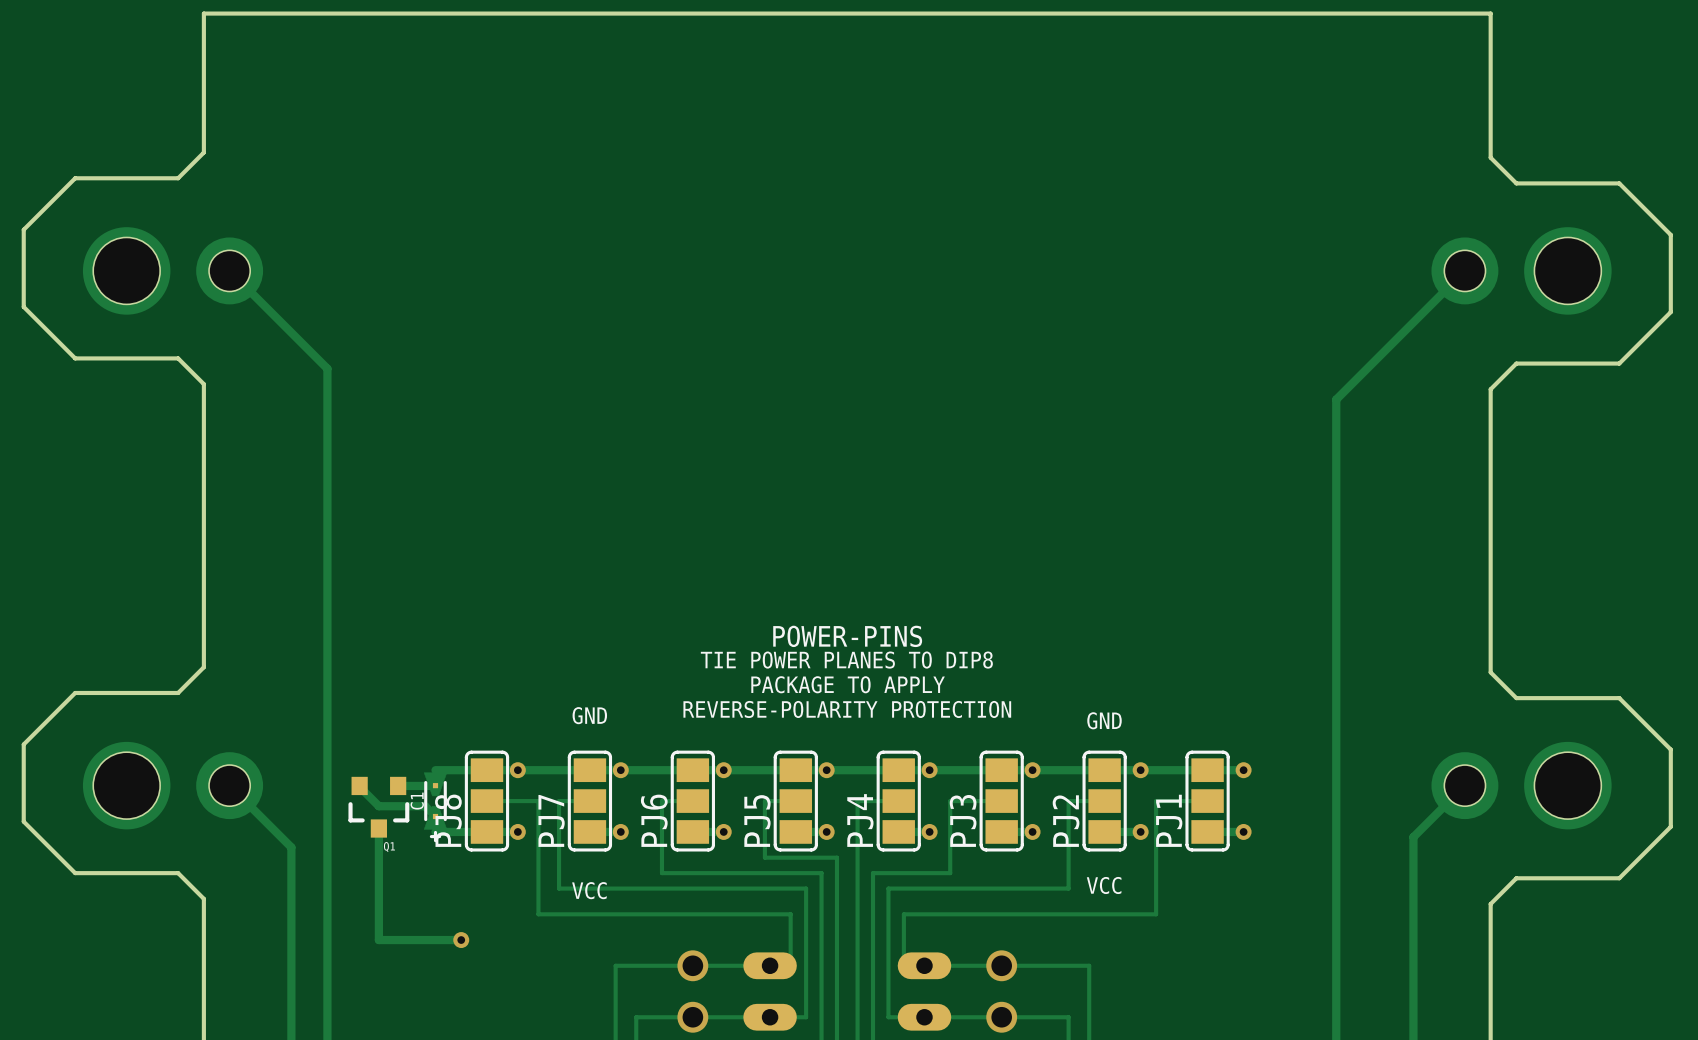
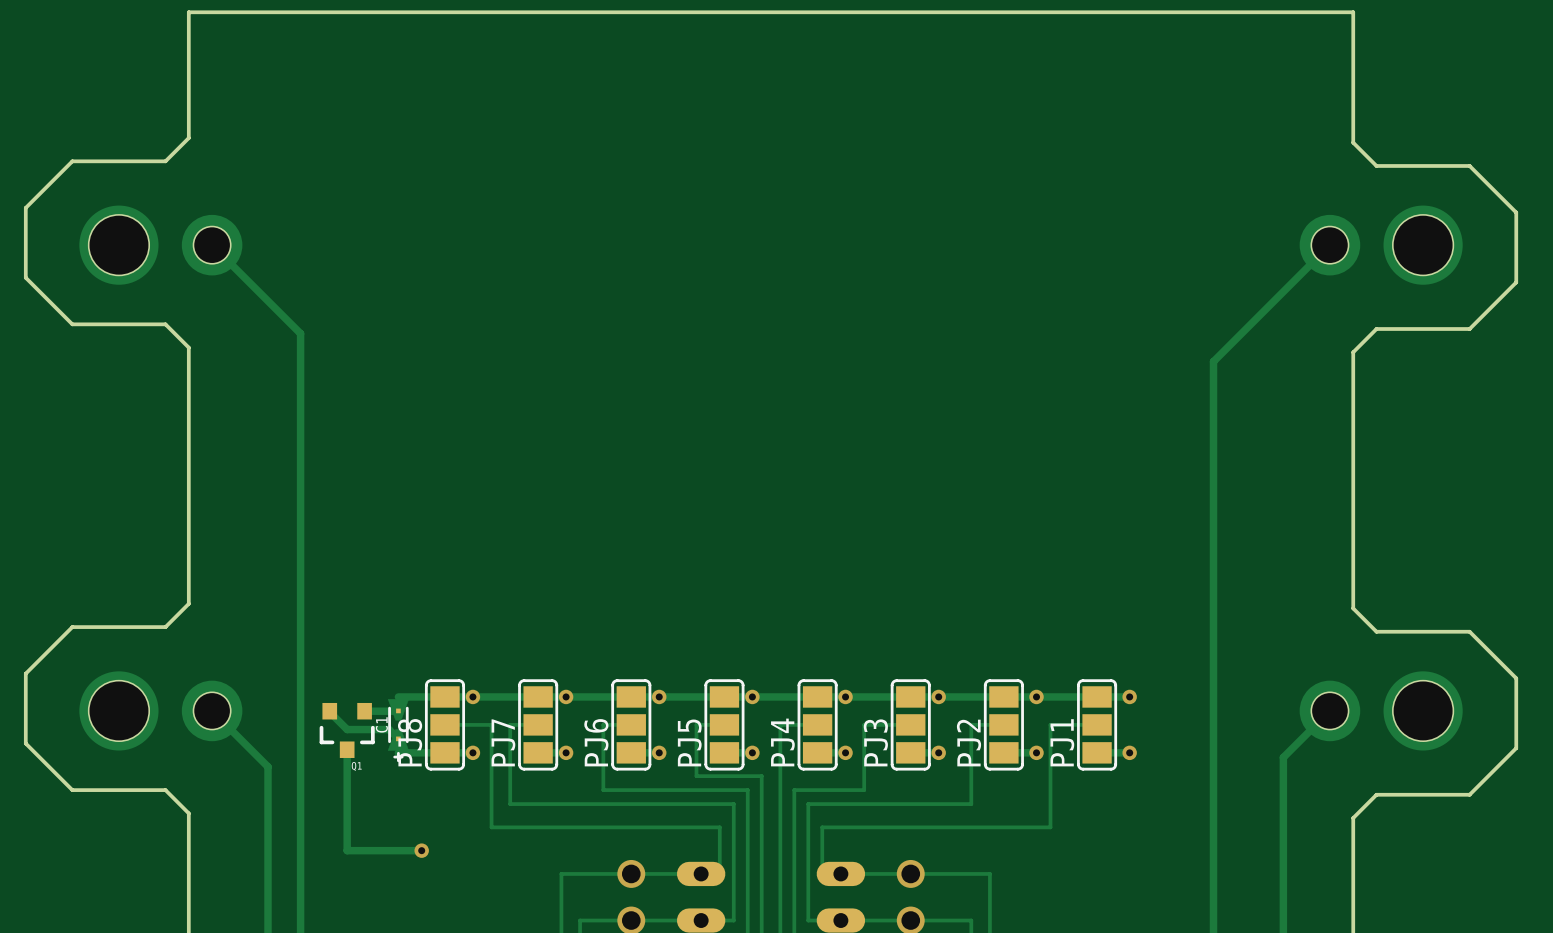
text: POWER-PINS (847, 636) -> none
text: TIE POWER PLANES TO DIP8 (846, 660) -> none
text: PACKAGE TO APPLY (848, 684) -> none
text: REVERSE-POLARITY PROTECTION (847, 709) -> none
text: GND (589, 715) -> none
text: GND (1104, 720) -> none
text: VCC (1104, 885) -> none
text: VCC (589, 890) -> none

